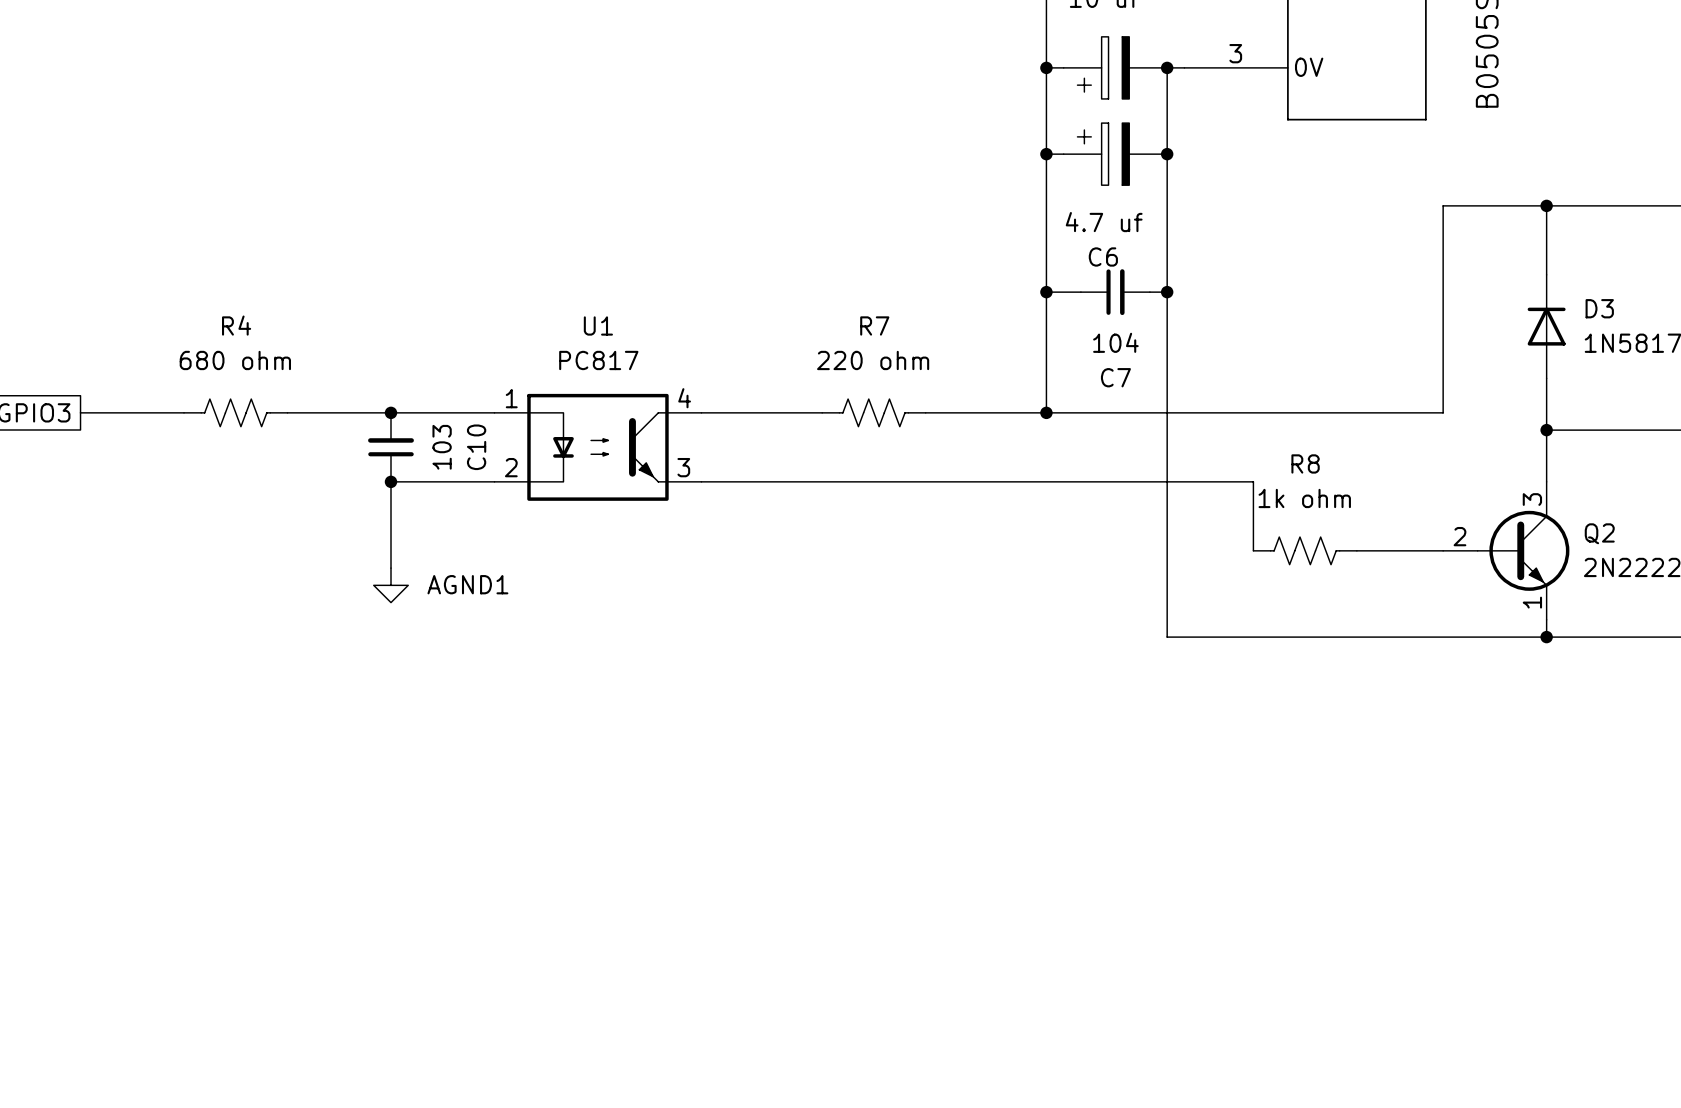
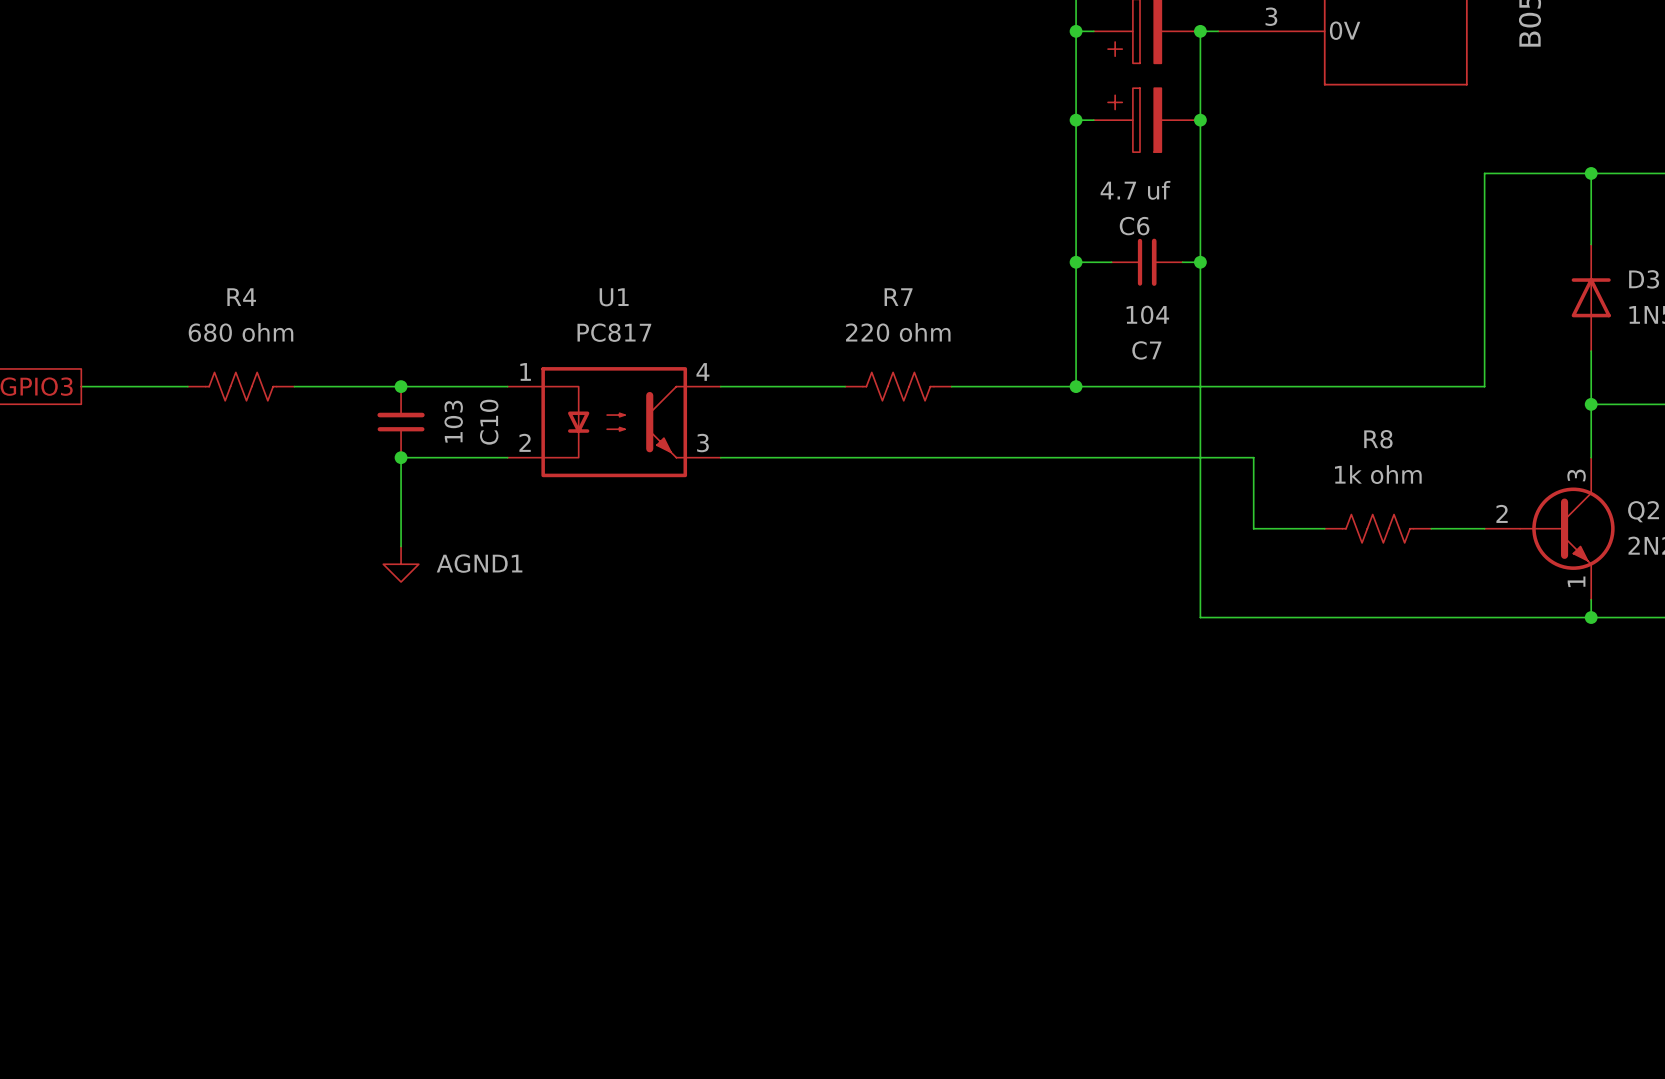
wire: (1218, 481) (1253, 481) (1253, 550) -> (1253, 457) (1253, 528) (1324, 528)
R8 position: (1305, 550) -> (1378, 528)

